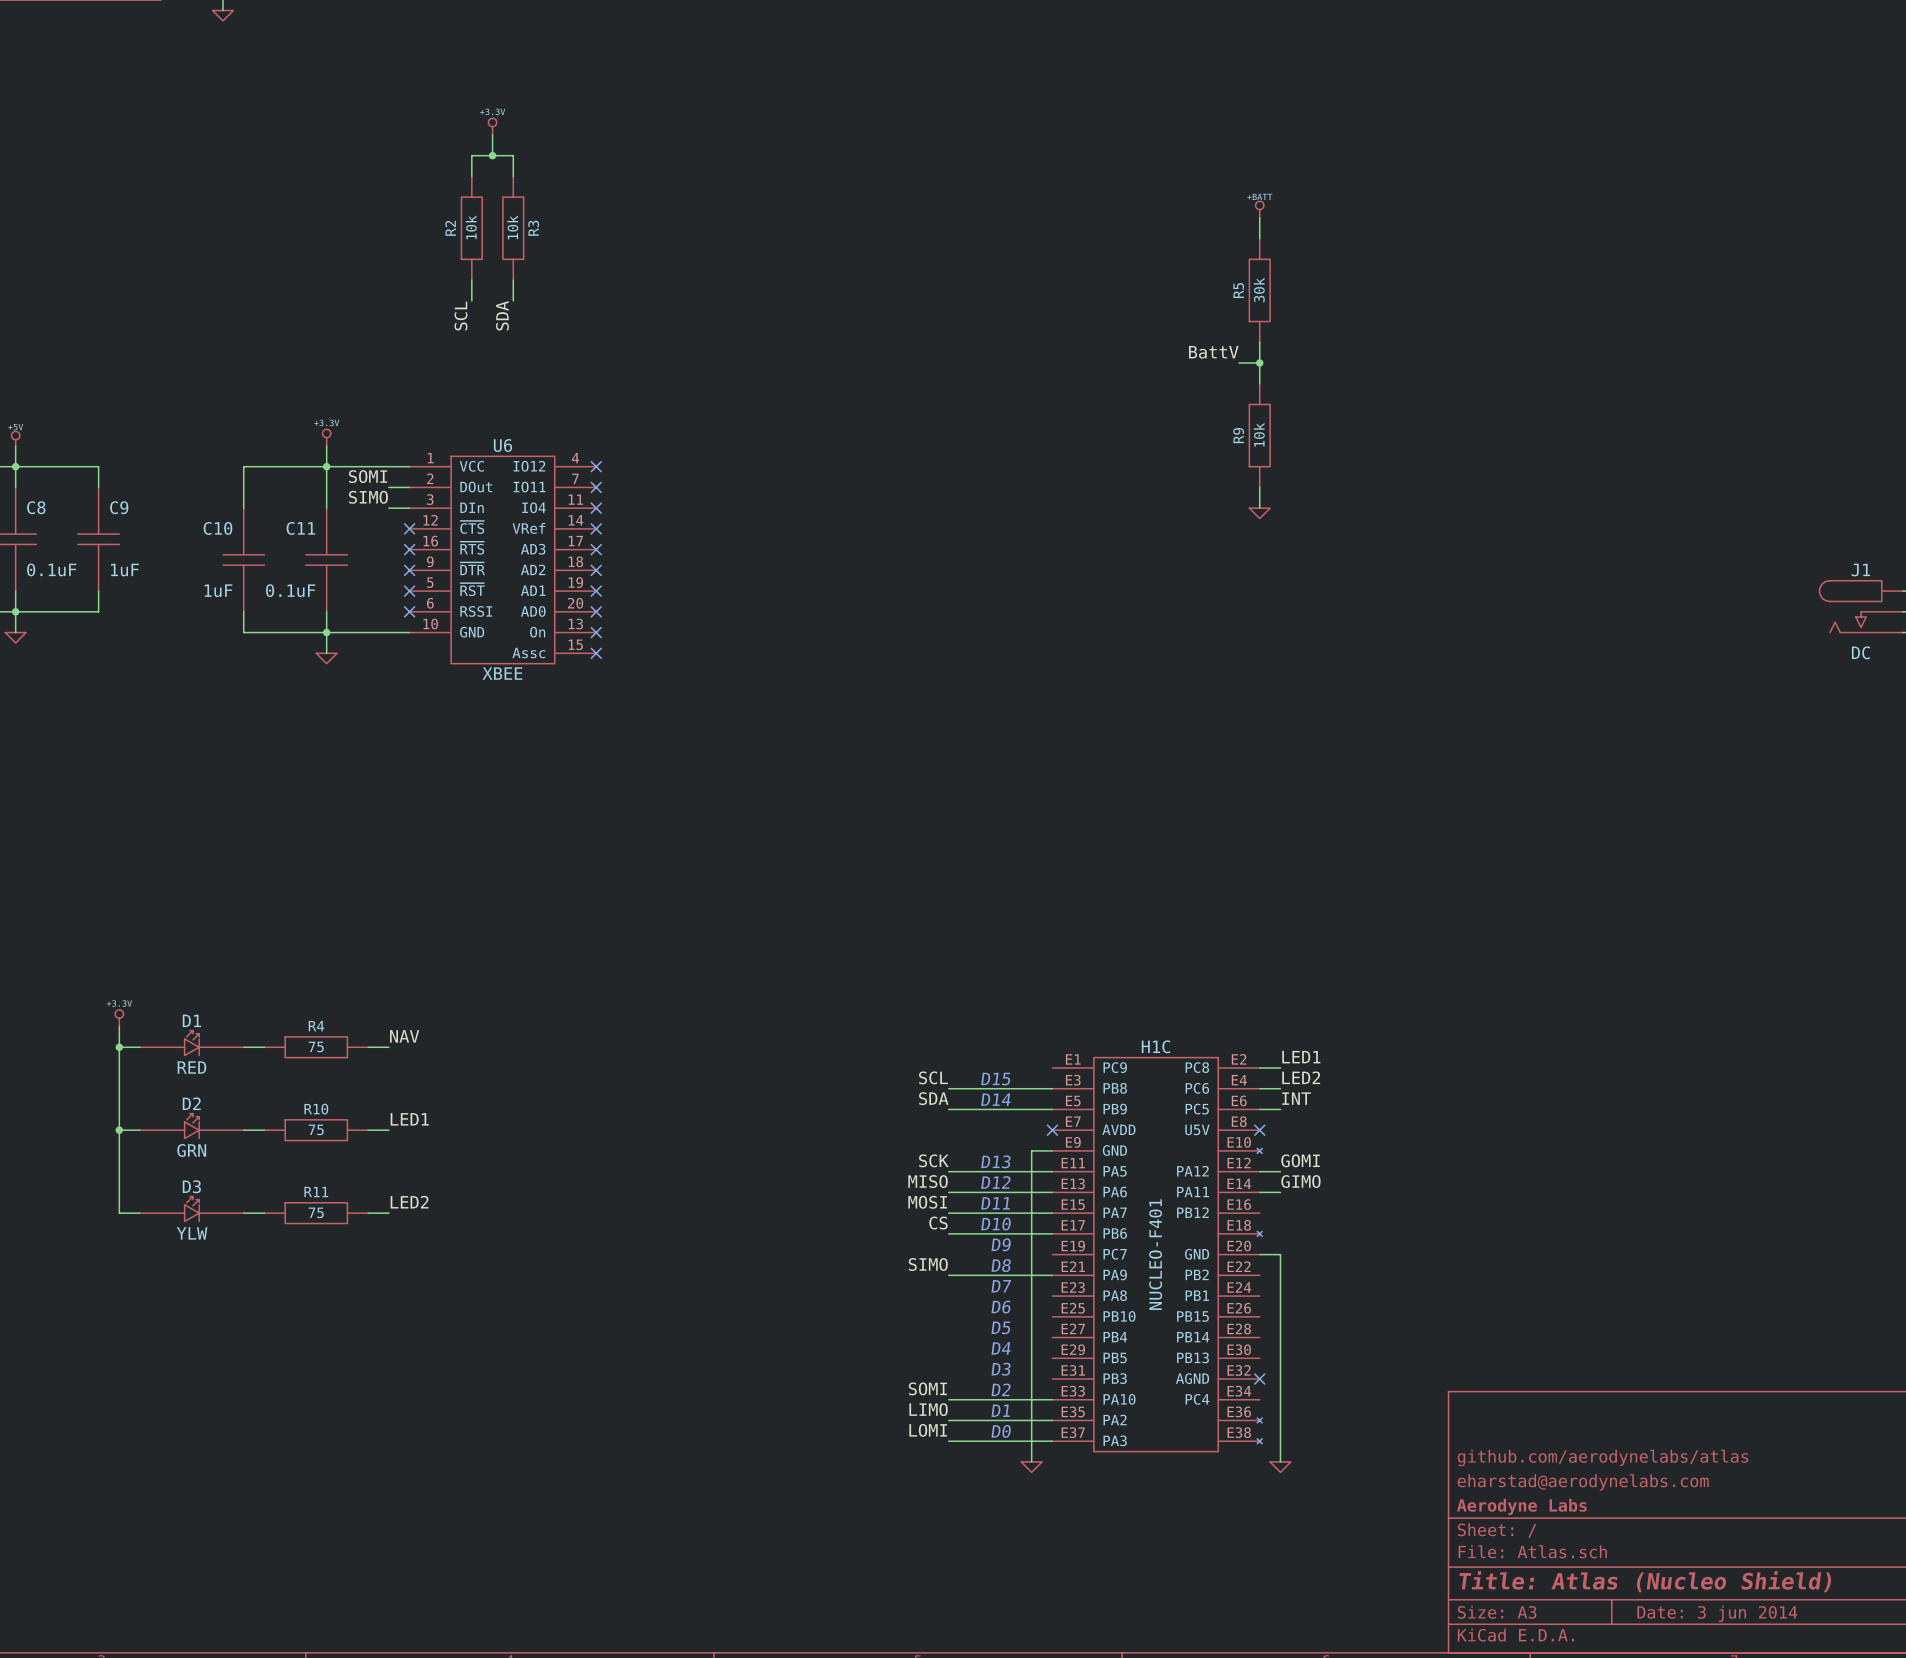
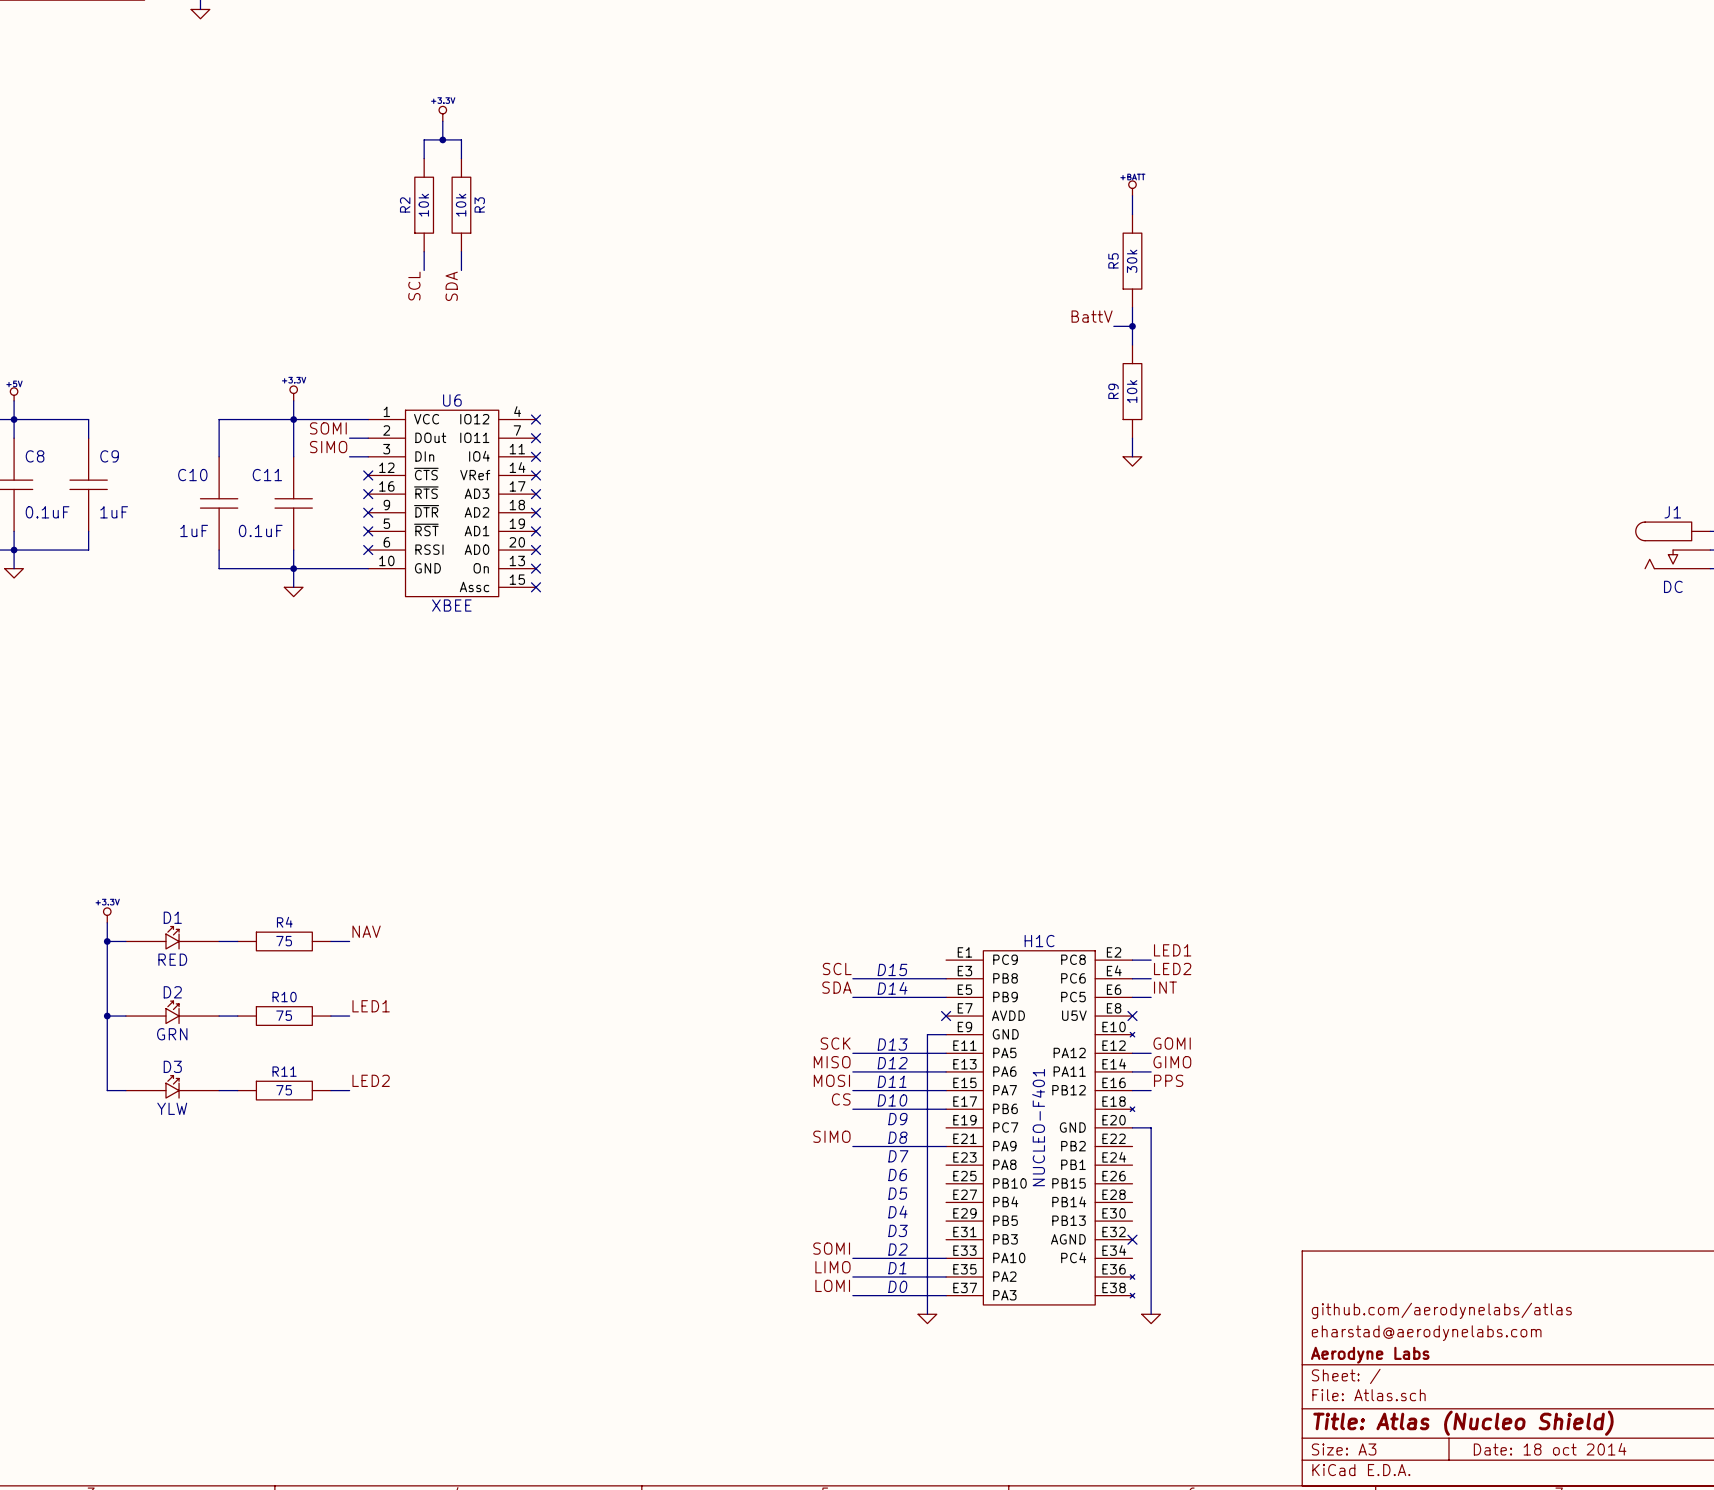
label: none -> PPS (1168, 1080)
wire: none -> (1132, 1090) (1151, 1090)
title block: Date: 3 jun 2014 (1717, 1613) -> Date: 18 oct 2014 (1550, 1449)

